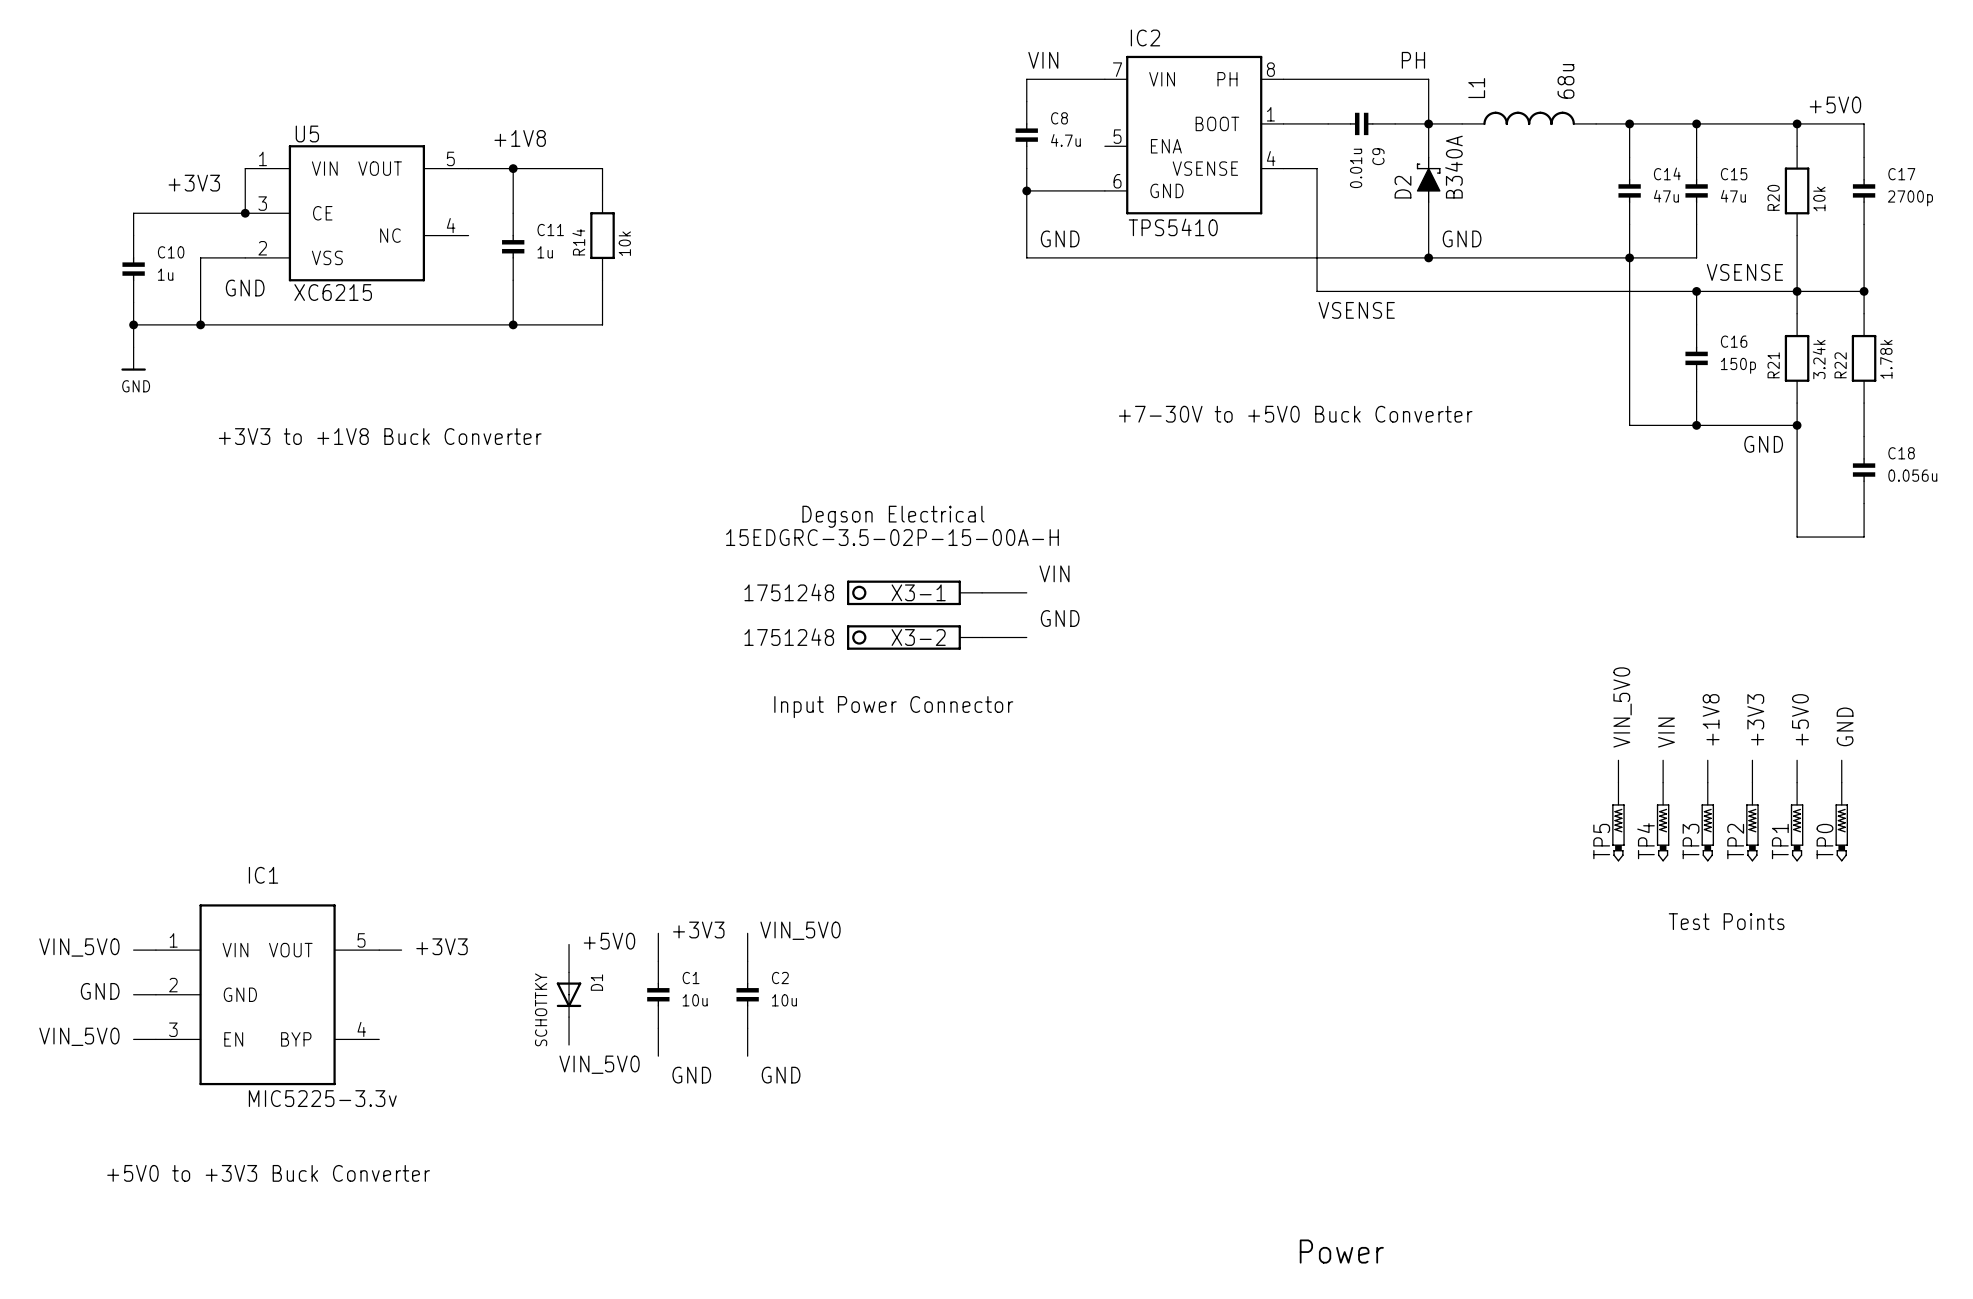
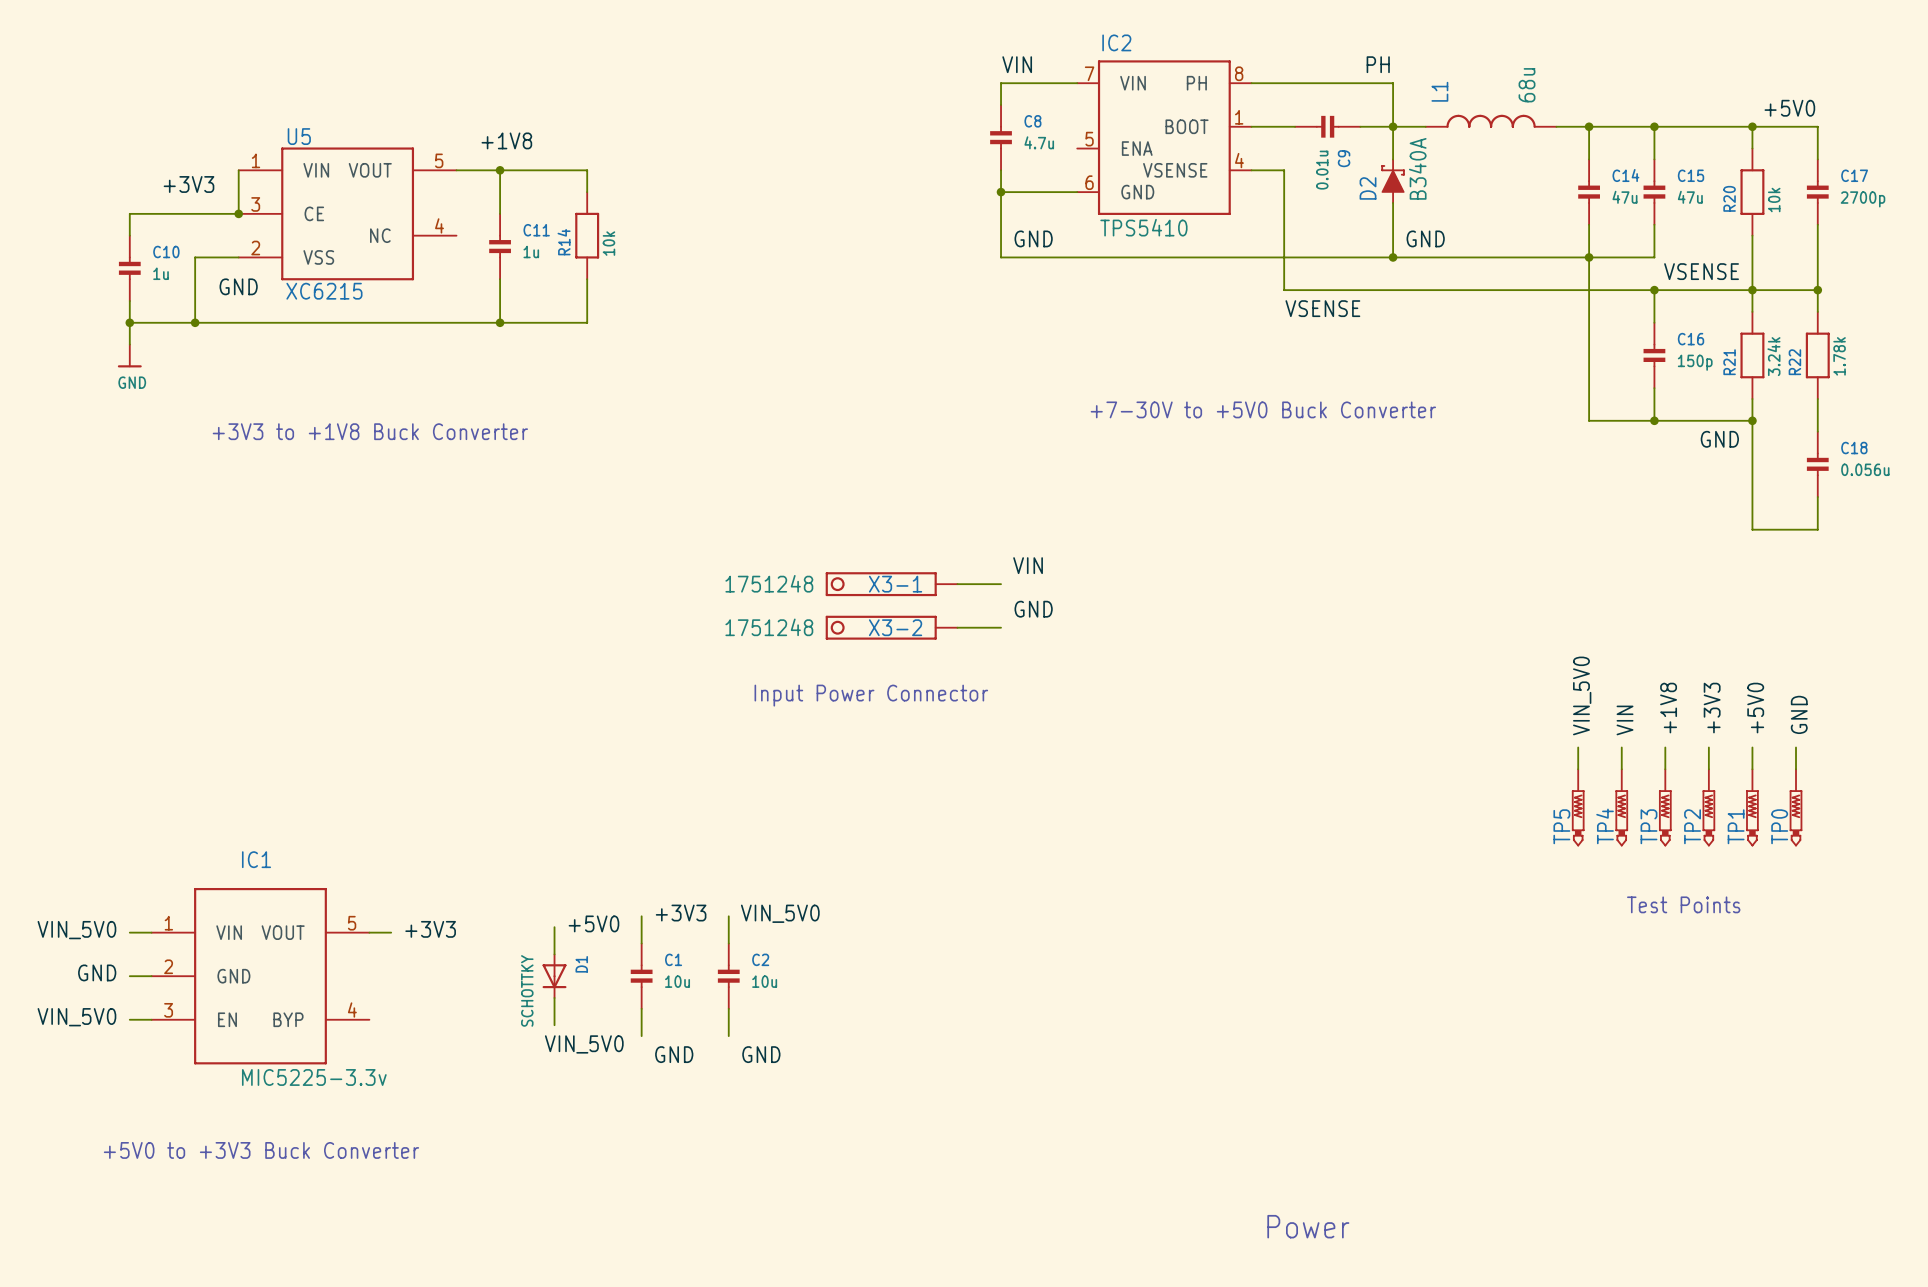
text: Degson Electrical (893, 516) -> none
text: 15EDGRC-3.5-02P-15-00A-H (892, 537) -> none

